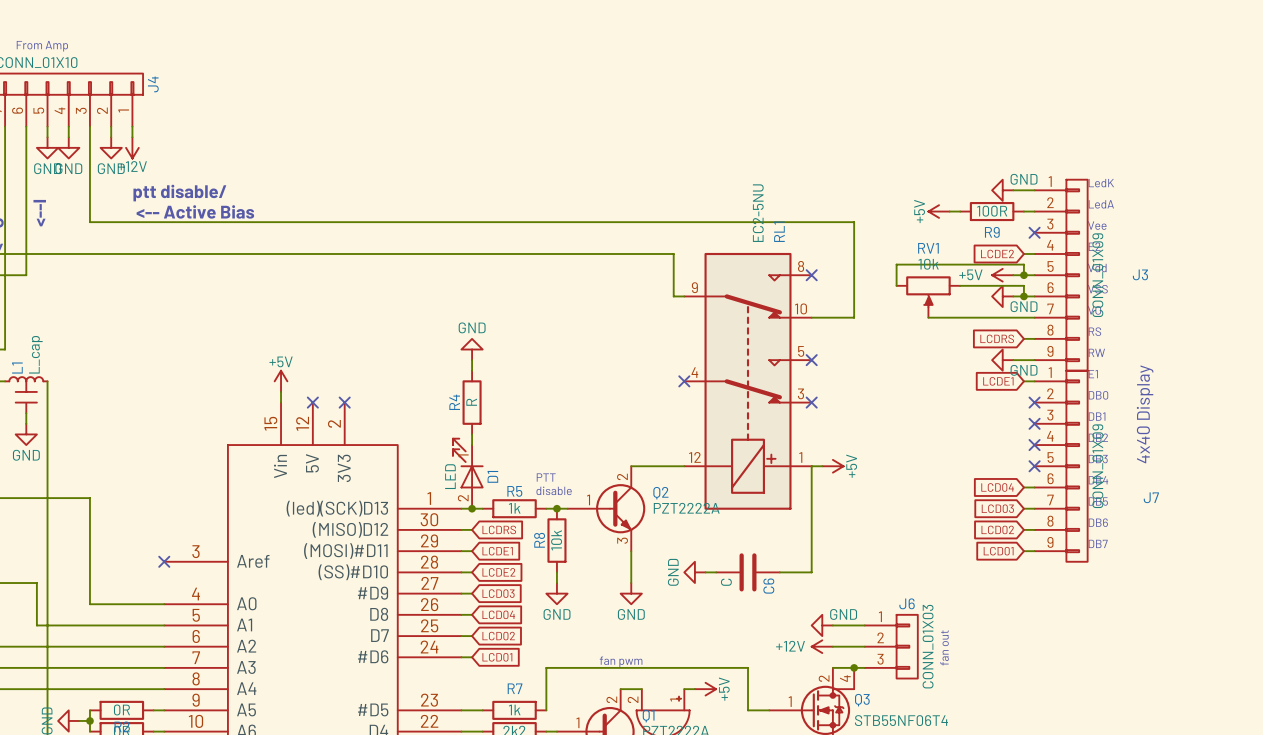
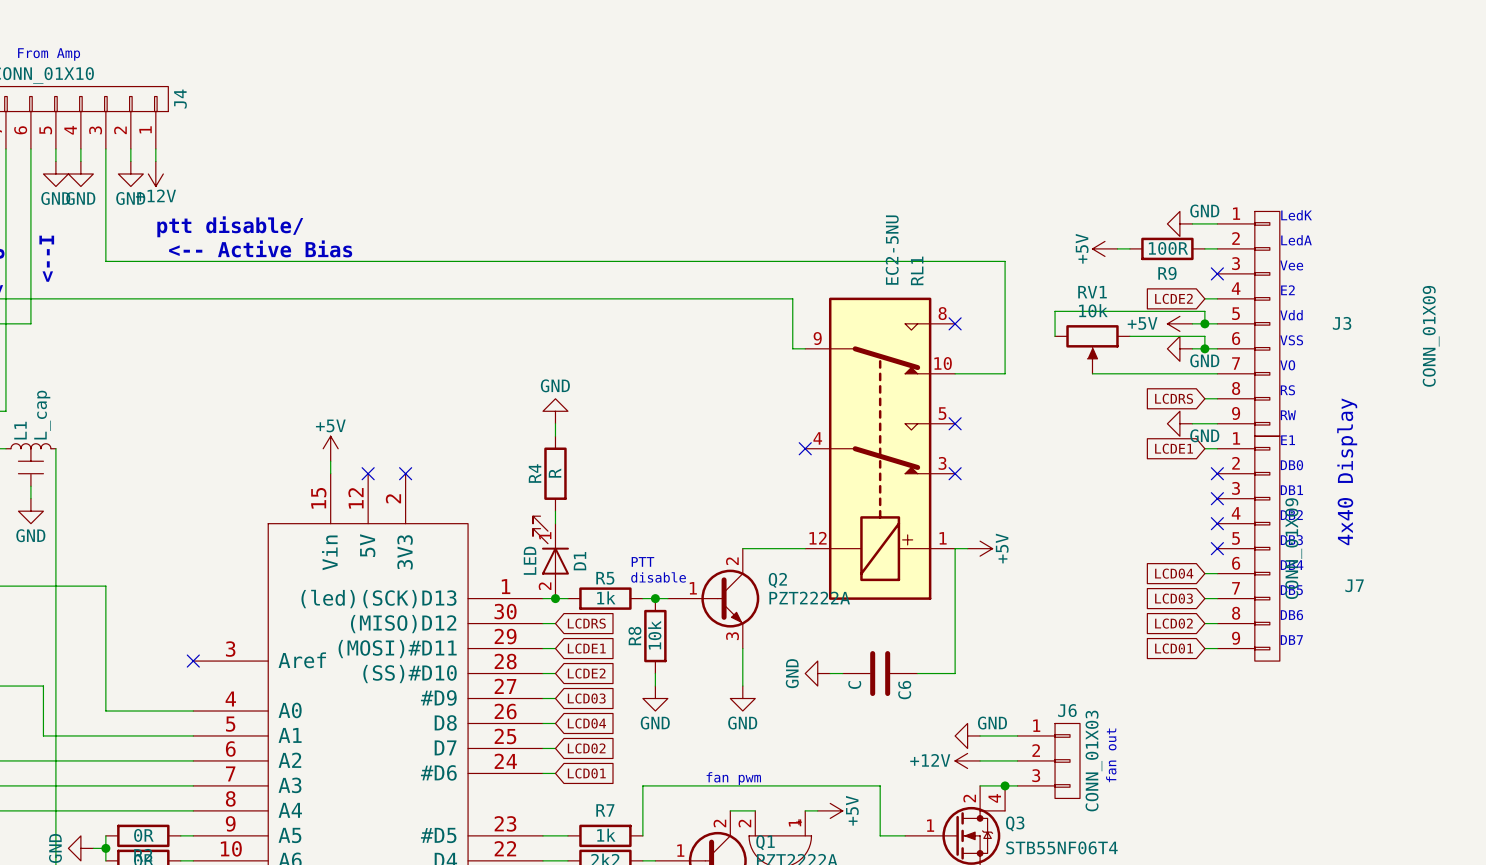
J3 value position: CONN_01X09 (1097, 275) -> CONN_01X09 (1431, 336)

